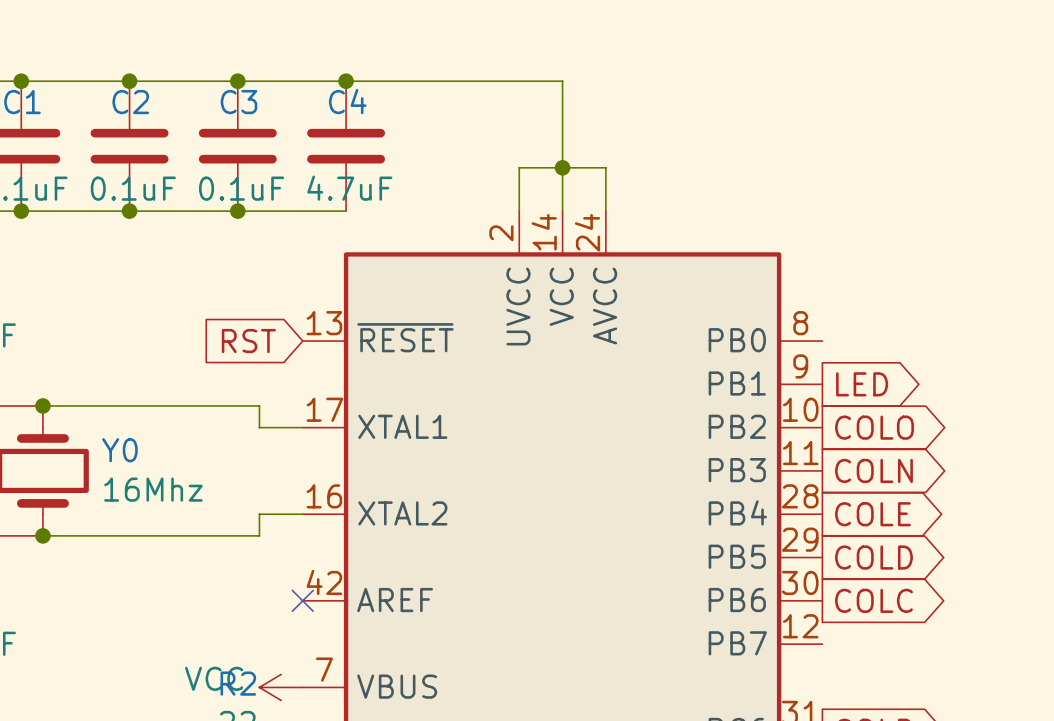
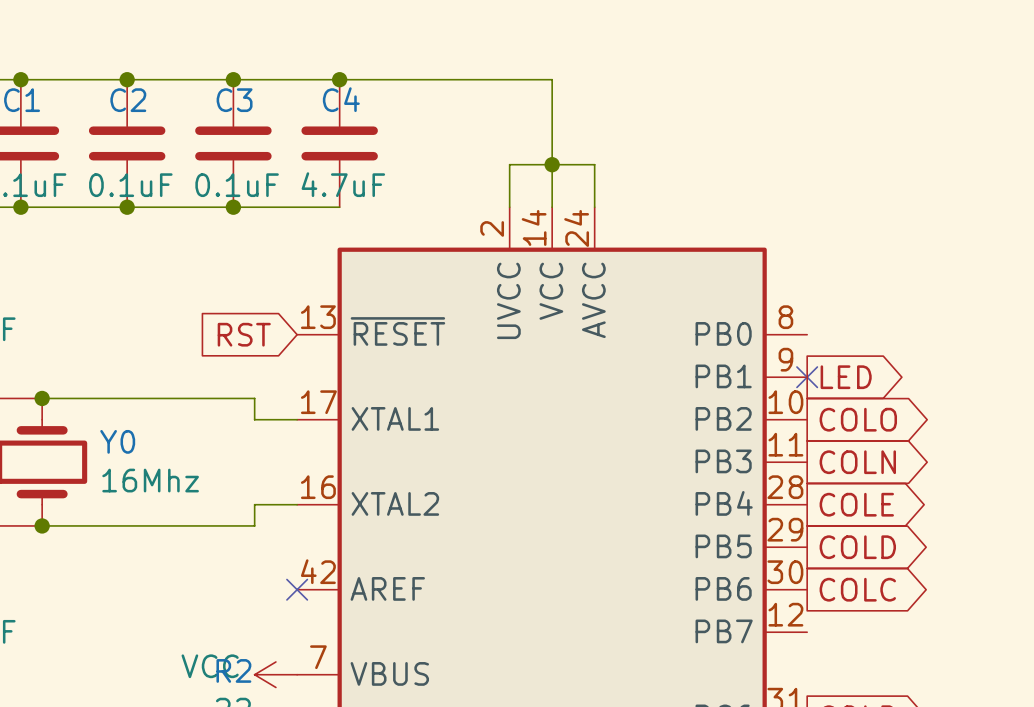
no-connect mark: none -> (807, 377)

